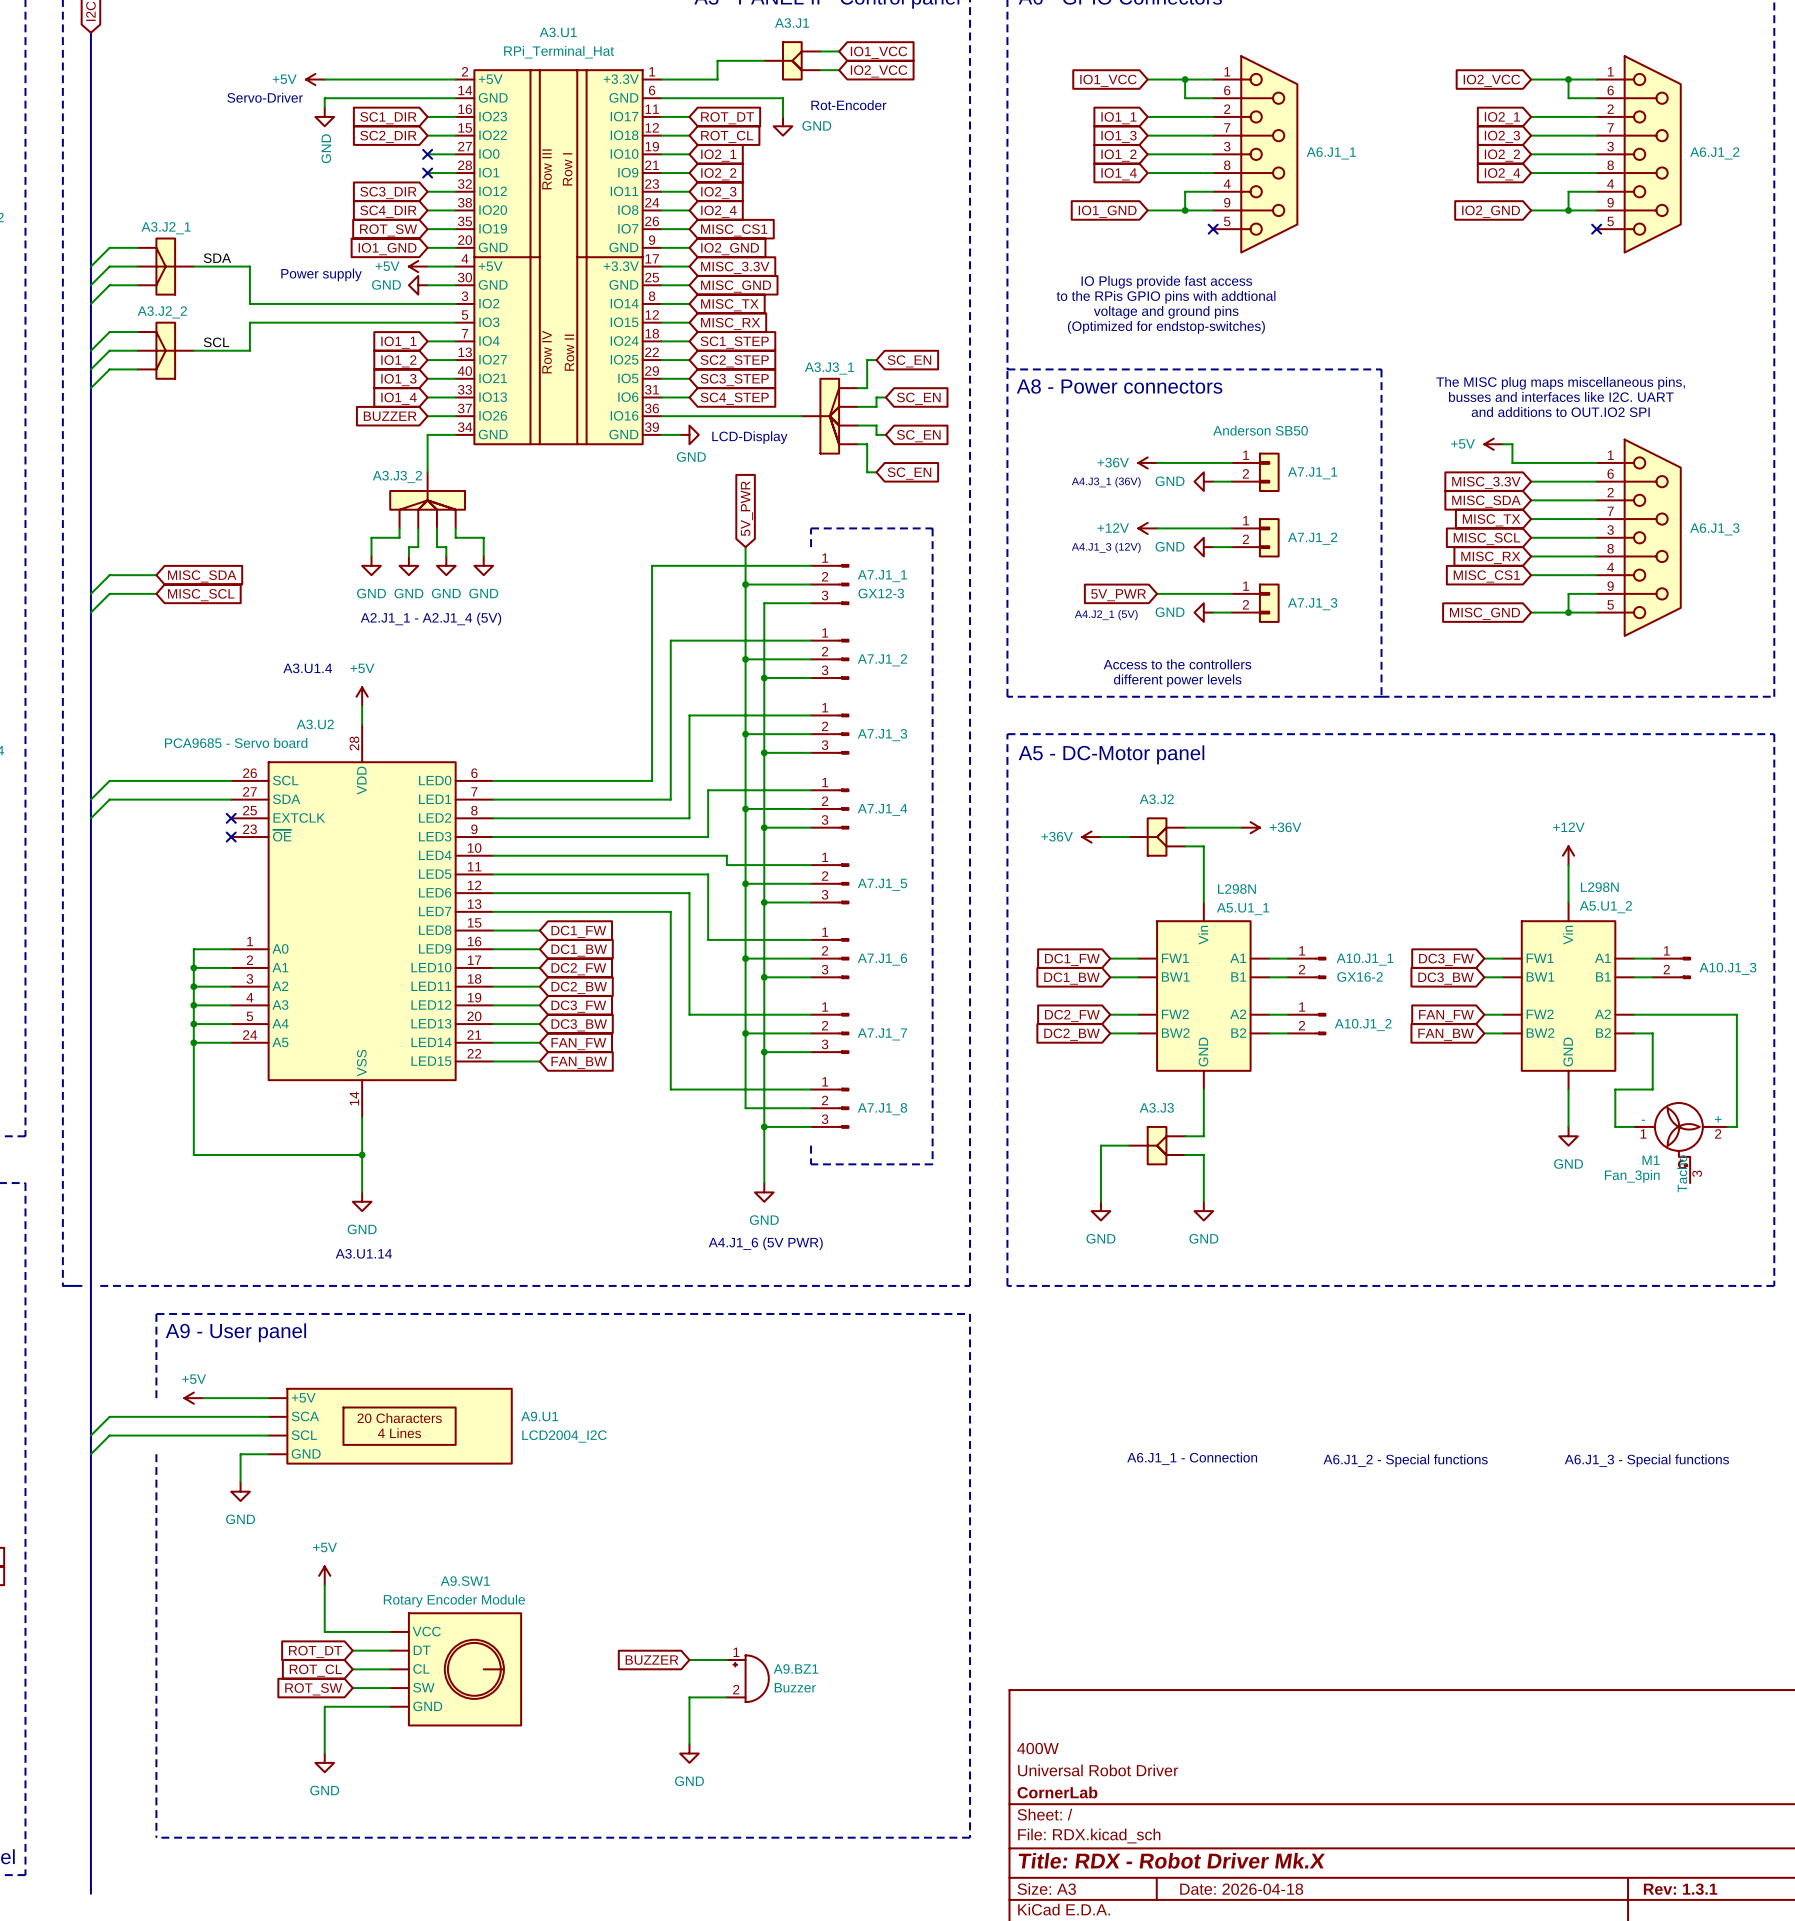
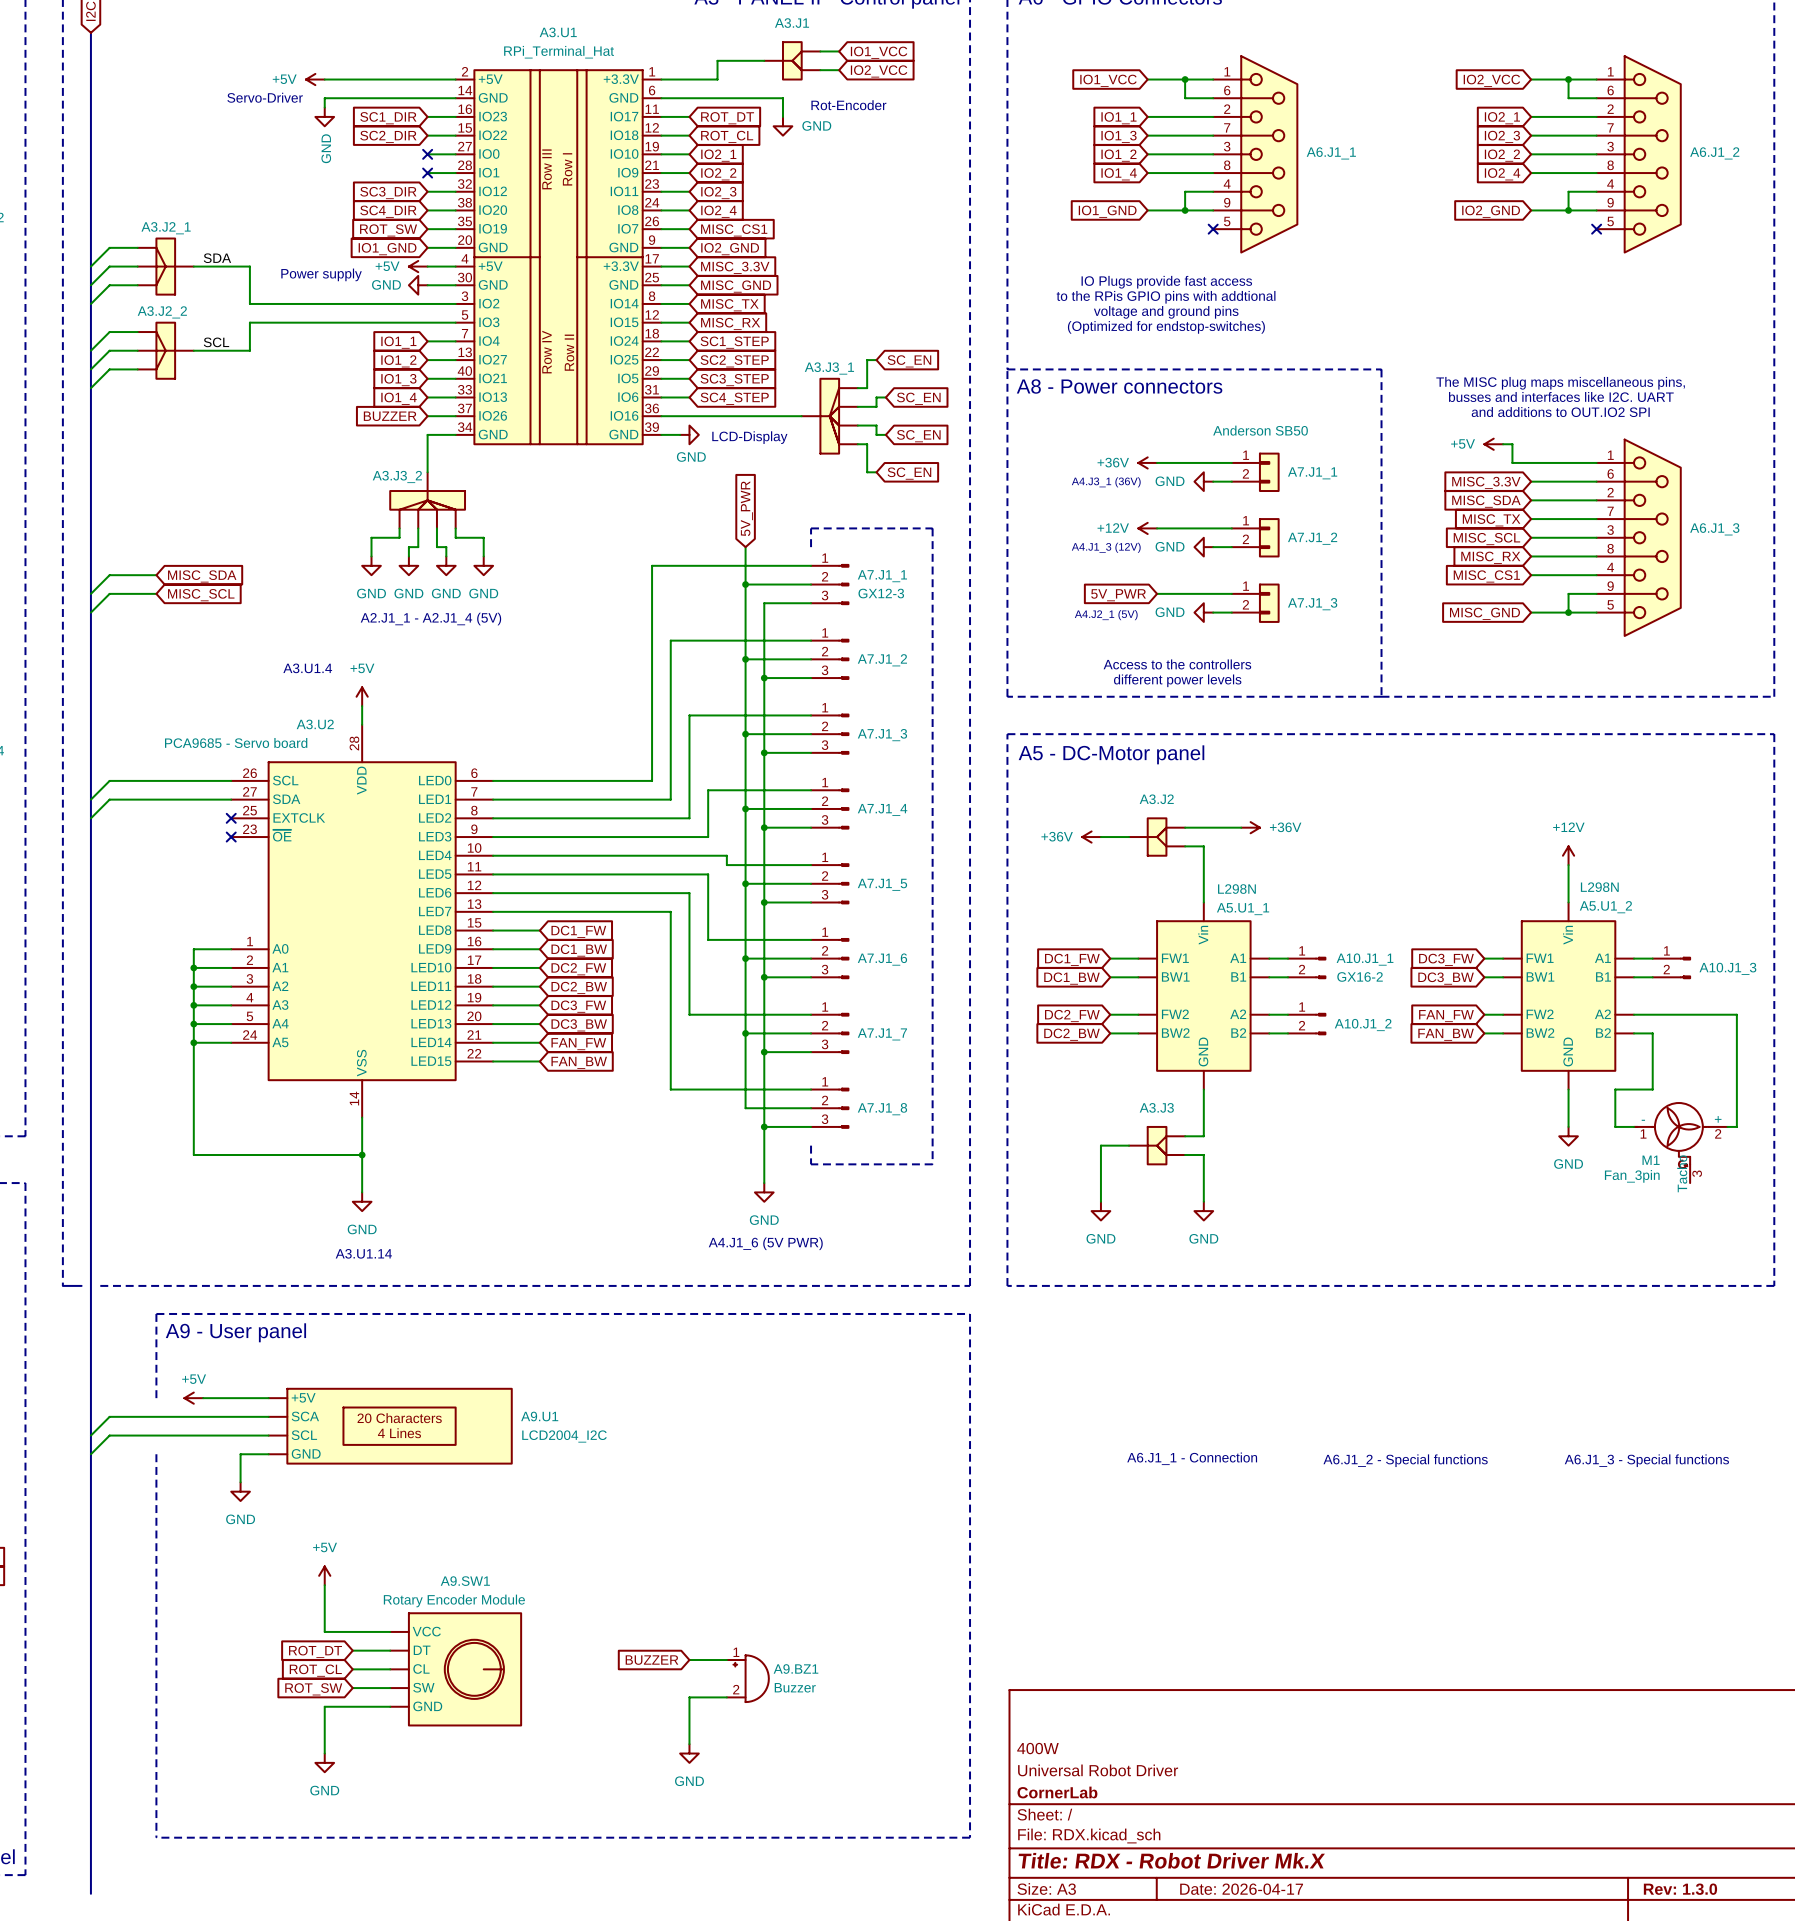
title block: Date: 2026-04-18 (1241, 1889) -> Date: 2026-04-17 (1241, 1889)
title block: Rev: 1.3.1 (1680, 1889) -> Rev: 1.3.0 (1680, 1889)

